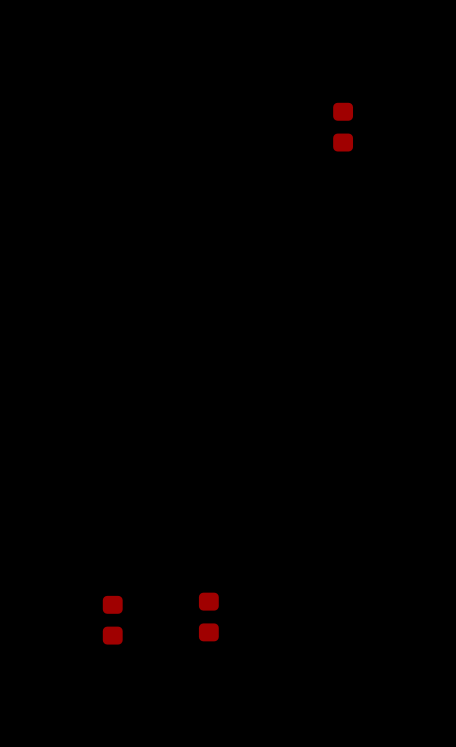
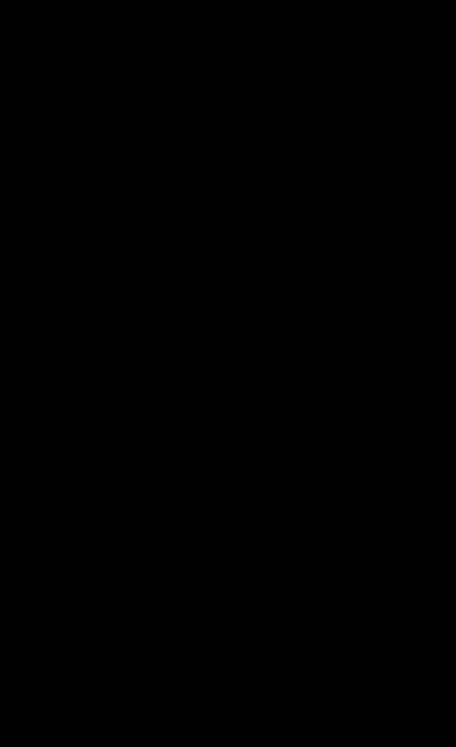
part: (343, 127) -> none
part: (208, 617) -> none
part: (112, 620) -> none

